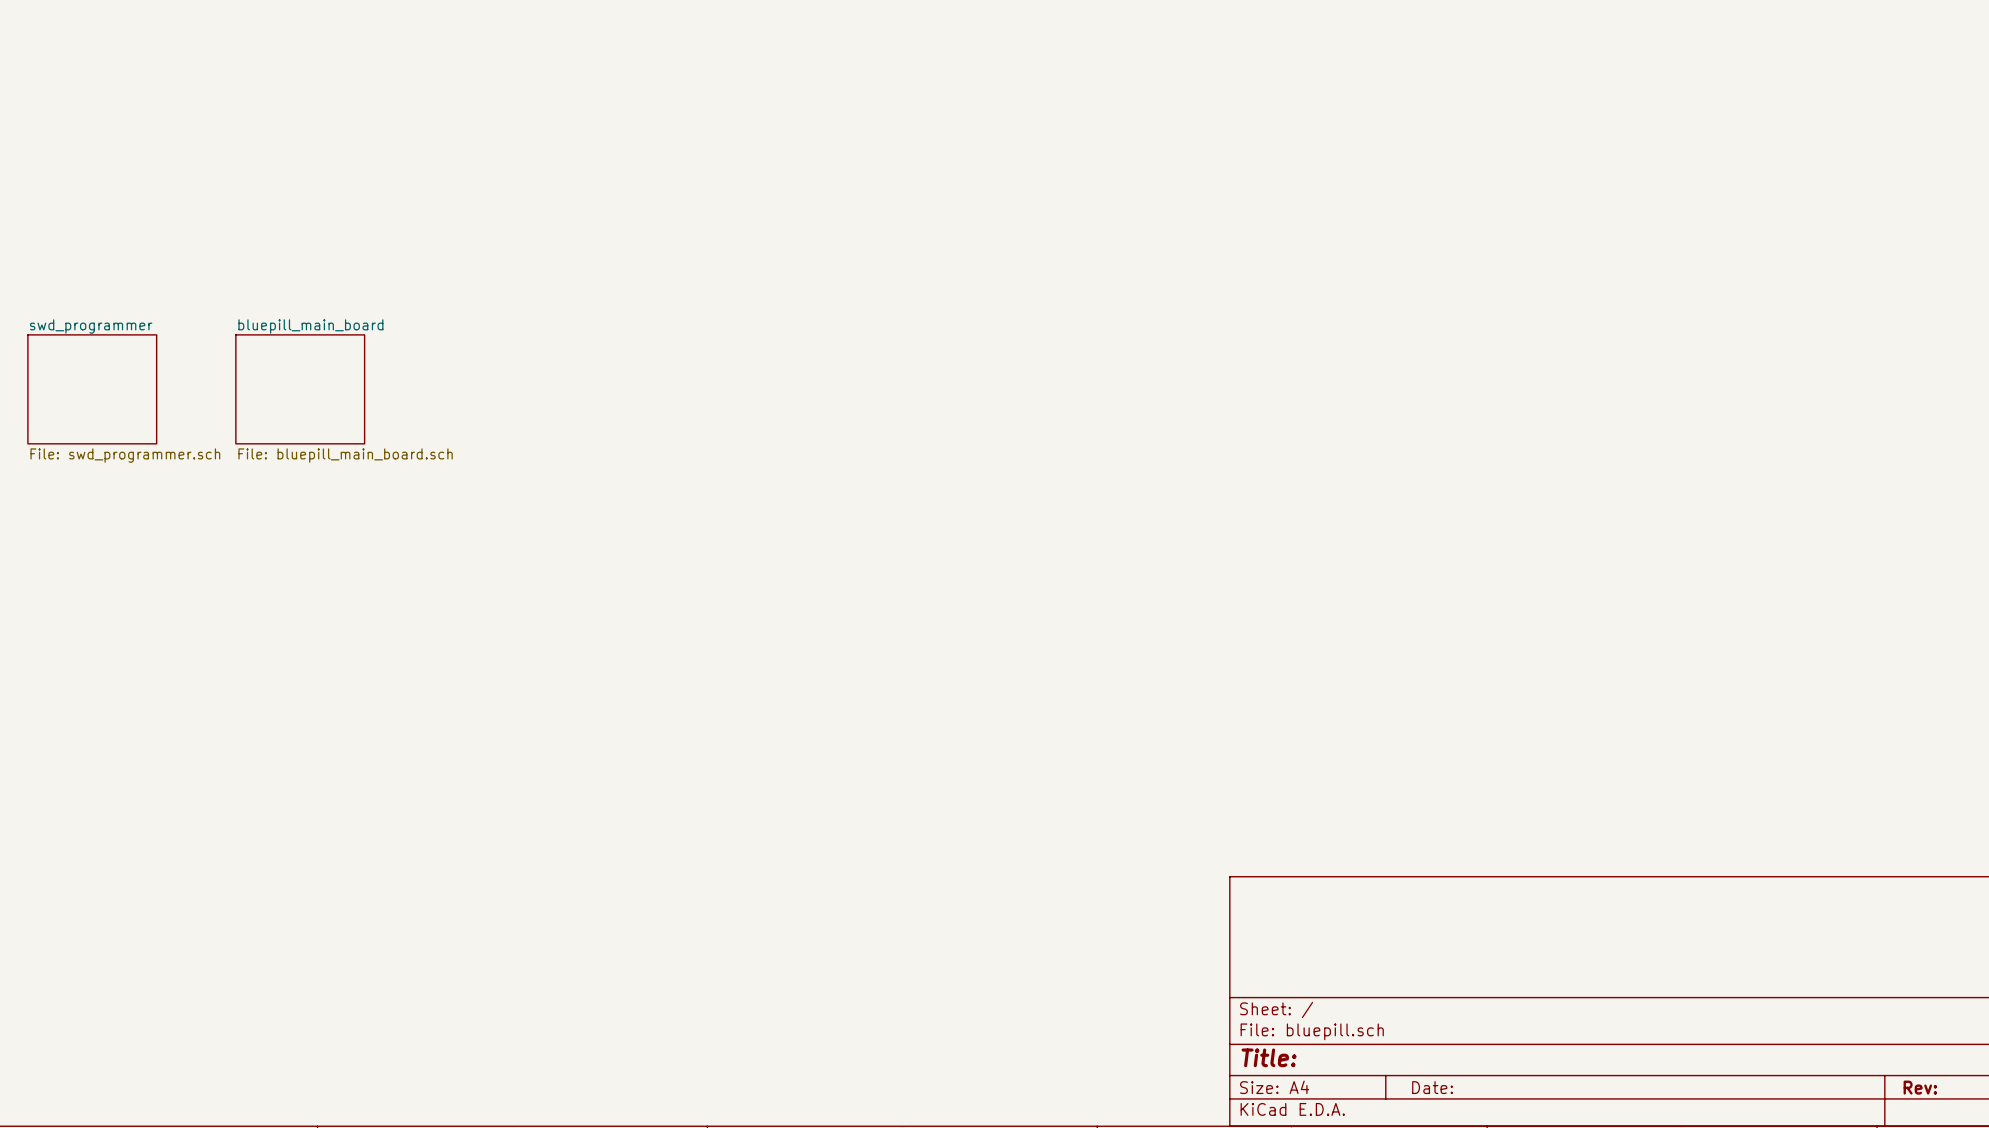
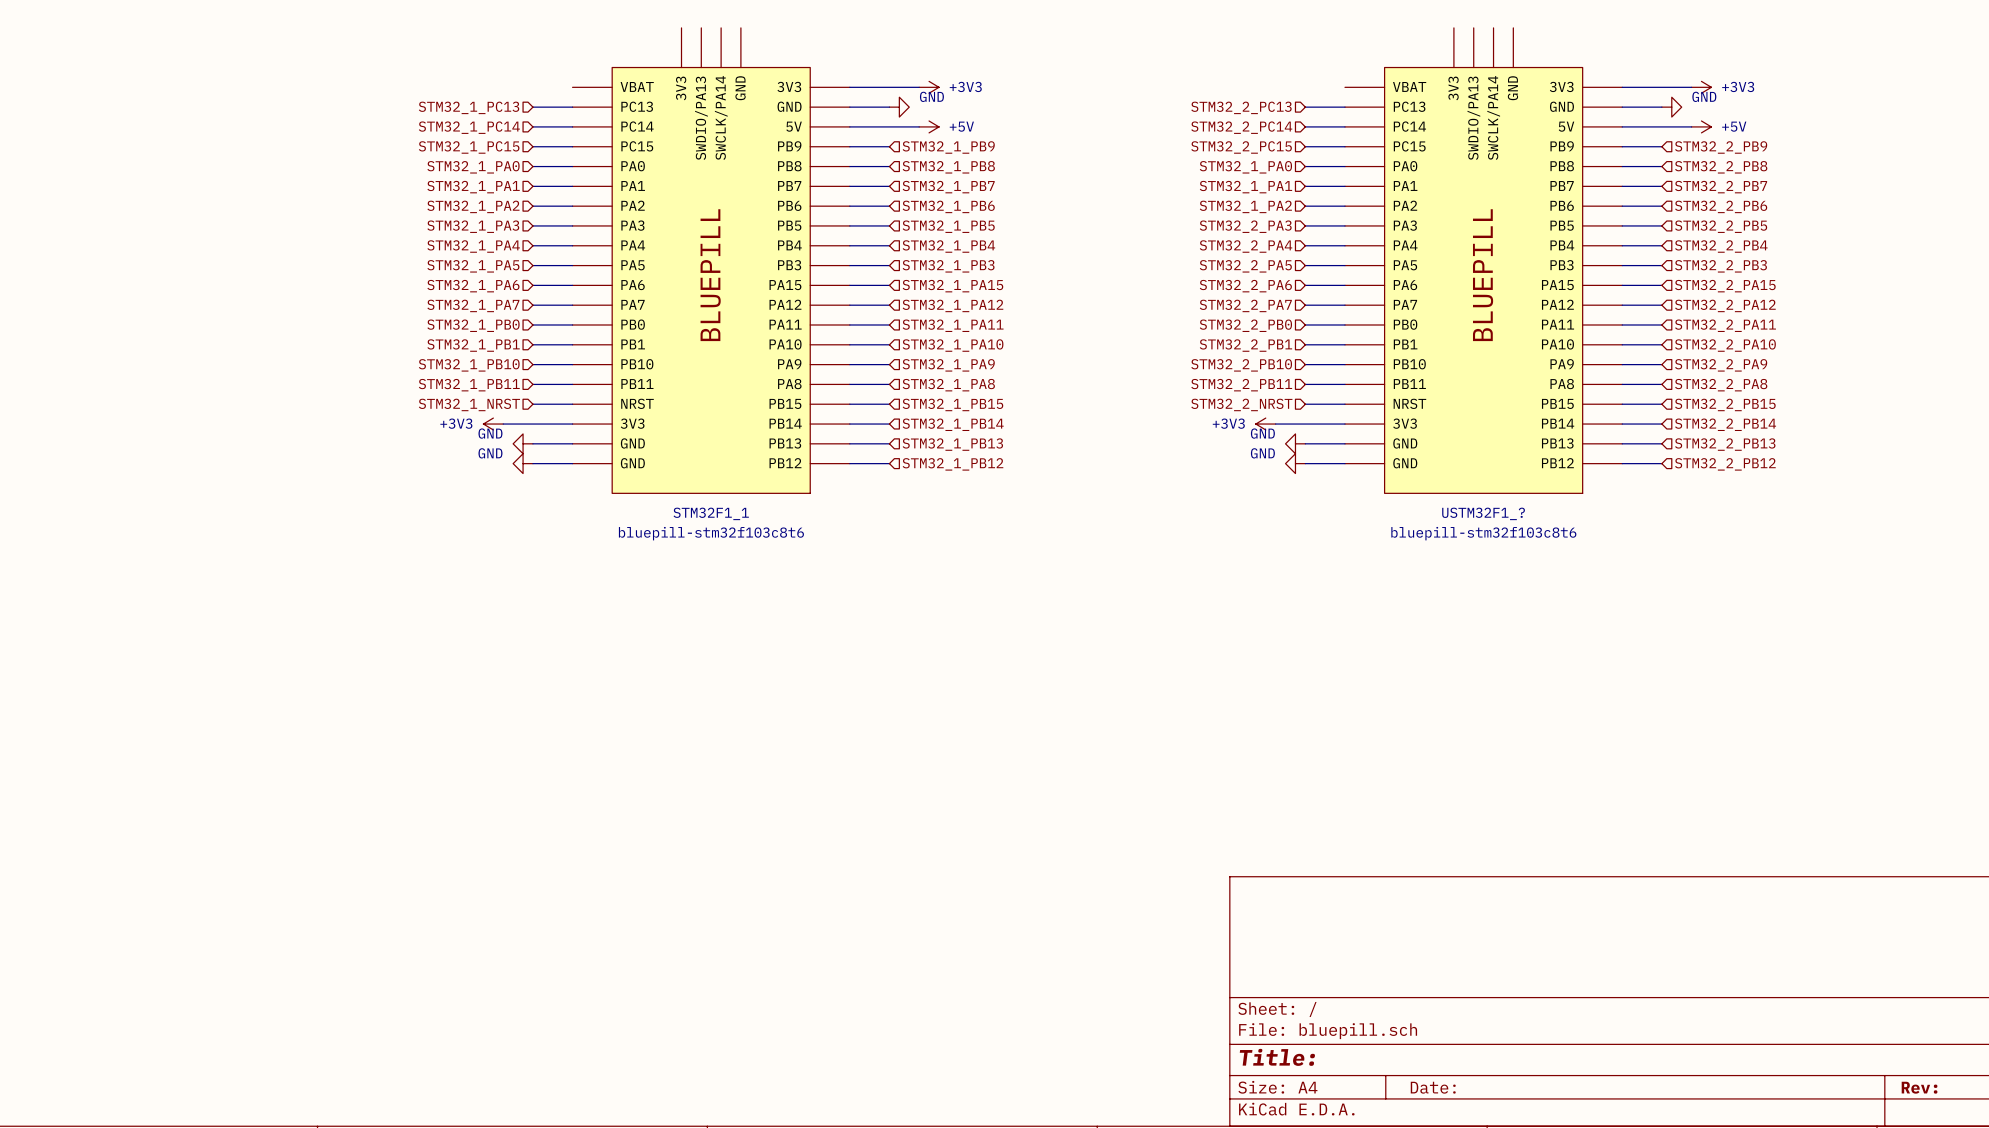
wire: none -> (849, 87) (919, 87)
power symbol: none -> +3V3 (929, 87)
wire: none -> (1622, 87) (1691, 87)
power symbol: none -> +3V3 (1701, 87)
hierarchical label: none -> STM32_1_PC13 (469, 107)
wire: none -> (532, 107) (572, 107)
wire: none -> (849, 107) (889, 107)
power symbol: none -> GND (899, 107)
hierarchical label: none -> STM32_2_PC13 (1241, 107)
wire: none -> (1305, 107) (1344, 107)
wire: none -> (1622, 107) (1661, 107)
power symbol: none -> GND (1671, 107)
hierarchical label: none -> STM32_1_PC14 (469, 127)
wire: none -> (532, 126) (572, 126)
wire: none -> (849, 126) (919, 126)
power symbol: none -> +5V (929, 126)
hierarchical label: none -> STM32_2_PC14 (1241, 127)
wire: none -> (1305, 126) (1344, 126)
wire: none -> (1622, 126) (1691, 126)
power symbol: none -> +5V (1701, 126)
hierarchical label: none -> STM32_1_PC15 (469, 147)
wire: none -> (532, 146) (572, 146)
wire: none -> (849, 146) (889, 146)
hierarchical label: none -> STM32_1_PB9 (948, 147)
hierarchical label: none -> STM32_2_PC15 (1241, 147)
wire: none -> (1305, 146) (1344, 146)
wire: none -> (1622, 146) (1661, 146)
hierarchical label: none -> STM32_2_PB9 (1721, 147)
hierarchical label: none -> STM32_1_PA0 (473, 167)
wire: none -> (532, 166) (572, 166)
wire: none -> (849, 166) (889, 166)
hierarchical label: none -> STM32_1_PB8 (948, 167)
hierarchical label: none -> STM32_1_PA0 (1245, 167)
wire: none -> (1305, 166) (1344, 166)
wire: none -> (1622, 166) (1661, 166)
hierarchical label: none -> STM32_2_PB8 (1721, 167)
hierarchical label: none -> STM32_1_PA1 (473, 187)
wire: none -> (532, 186) (572, 186)
wire: none -> (849, 186) (889, 186)
hierarchical label: none -> STM32_1_PB7 (948, 187)
hierarchical label: none -> STM32_1_PA1 (1245, 187)
wire: none -> (1305, 186) (1344, 186)
wire: none -> (1622, 186) (1661, 186)
hierarchical label: none -> STM32_2_PB7 (1721, 187)
hierarchical label: none -> STM32_1_PA2 (473, 206)
wire: none -> (532, 206) (572, 206)
wire: none -> (849, 206) (889, 206)
hierarchical label: none -> STM32_1_PB6 (948, 206)
hierarchical label: none -> STM32_1_PA2 (1245, 206)
wire: none -> (1305, 206) (1344, 206)
wire: none -> (1622, 206) (1661, 206)
hierarchical label: none -> STM32_2_PB6 (1721, 206)
wire: none -> (532, 225) (572, 225)
wire: none -> (849, 225) (889, 225)
wire: none -> (1305, 225) (1344, 225)
wire: none -> (1622, 225) (1661, 225)
hierarchical label: none -> STM32_1_PA3 (473, 226)
hierarchical label: none -> STM32_1_PB5 (948, 226)
hierarchical label: none -> STM32_2_PA3 (1245, 226)
hierarchical label: none -> STM32_2_PB5 (1721, 226)
hierarchical label: none -> STM32_1_PA4 (473, 246)
wire: none -> (532, 245) (572, 245)
wire: none -> (849, 245) (889, 245)
hierarchical label: none -> STM32_1_PB4 (948, 246)
hierarchical label: none -> STM32_2_PA4 (1246, 246)
wire: none -> (1305, 245) (1344, 245)
wire: none -> (1622, 245) (1661, 245)
hierarchical label: none -> STM32_2_PB4 (1721, 246)
STM32F1_1: none -> bluepill-stm32f103c8t6 (711, 260)
USTM32F1_?: none -> bluepill-stm32f103c8t6 (1483, 260)
hierarchical label: none -> STM32_1_PA5 (473, 266)
wire: none -> (532, 265) (572, 265)
wire: none -> (849, 265) (889, 265)
hierarchical label: none -> STM32_1_PB3 (948, 266)
hierarchical label: none -> STM32_2_PA5 (1245, 266)
wire: none -> (1305, 265) (1344, 265)
wire: none -> (1622, 265) (1661, 265)
hierarchical label: none -> STM32_2_PB3 (1721, 266)
hierarchical label: none -> STM32_1_PA6 (473, 286)
wire: none -> (532, 285) (572, 285)
wire: none -> (849, 285) (889, 285)
hierarchical label: none -> STM32_1_PA15 (952, 286)
hierarchical label: none -> STM32_2_PA6 (1245, 286)
wire: none -> (1305, 285) (1344, 285)
wire: none -> (1622, 285) (1661, 285)
hierarchical label: none -> STM32_2_PA15 (1725, 286)
hierarchical label: none -> STM32_1_PA7 (473, 305)
wire: none -> (532, 305) (572, 305)
wire: none -> (849, 305) (889, 305)
hierarchical label: none -> STM32_1_PA12 (952, 305)
hierarchical label: none -> STM32_2_PA7 (1245, 305)
wire: none -> (1305, 305) (1344, 305)
wire: none -> (1622, 305) (1661, 305)
hierarchical label: none -> STM32_2_PA12 (1725, 305)
wire: none -> (532, 324) (572, 324)
wire: none -> (849, 324) (889, 324)
wire: none -> (1305, 324) (1344, 324)
wire: none -> (1622, 324) (1661, 324)
hierarchical label: none -> STM32_1_PB0 (473, 325)
hierarchical label: none -> STM32_1_PA11 (953, 325)
hierarchical label: none -> STM32_2_PB0 (1245, 325)
hierarchical label: none -> STM32_2_PA11 (1725, 325)
hierarchical label: none -> STM32_1_PB1 (473, 345)
wire: none -> (532, 344) (572, 344)
wire: none -> (849, 344) (889, 344)
hierarchical label: none -> STM32_1_PA10 (953, 345)
hierarchical label: none -> STM32_2_PB1 (1245, 345)
wire: none -> (1305, 344) (1344, 344)
wire: none -> (1622, 344) (1661, 344)
hierarchical label: none -> STM32_2_PA10 (1725, 345)
hierarchical label: none -> STM32_1_PB10 (469, 365)
wire: none -> (532, 364) (572, 364)
wire: none -> (849, 364) (889, 364)
hierarchical label: none -> STM32_1_PA9 (948, 365)
hierarchical label: none -> STM32_2_PB10 (1241, 365)
wire: none -> (1305, 364) (1344, 364)
wire: none -> (1622, 364) (1661, 364)
hierarchical label: none -> STM32_2_PA9 (1721, 365)
hierarchical label: none -> STM32_1_PB11 (469, 385)
wire: none -> (532, 384) (572, 384)
wire: none -> (849, 384) (889, 384)
hierarchical label: none -> STM32_1_PA8 (948, 385)
hierarchical label: none -> STM32_2_PB11 (1241, 385)
wire: none -> (1305, 384) (1344, 384)
wire: none -> (1622, 384) (1661, 384)
hierarchical label: none -> STM32_2_PA8 (1721, 385)
sheet swd_programmer: File: swd_programmer.sch (92, 389) -> none
sheet bluepill_main_board: File: bluepill_main_board.sch (300, 389) -> none
hierarchical label: none -> STM32_1_NRST (469, 404)
wire: none -> (532, 404) (572, 404)
wire: none -> (849, 404) (889, 404)
hierarchical label: none -> STM32_1_PB15 (952, 404)
hierarchical label: none -> STM32_2_NRST (1241, 404)
wire: none -> (1305, 404) (1344, 404)
wire: none -> (1622, 404) (1661, 404)
hierarchical label: none -> STM32_2_PB15 (1725, 404)
hierarchical label: none -> STM32_1_PB14 (953, 424)
hierarchical label: none -> STM32_2_PB14 (1725, 424)
power symbol: none -> +3V3 (493, 424)
wire: none -> (503, 424) (572, 424)
wire: none -> (849, 424) (889, 424)
power symbol: none -> +3V3 (1265, 424)
wire: none -> (1275, 424) (1344, 424)
wire: none -> (1622, 424) (1661, 424)
power symbol: none -> GND (523, 443)
wire: none -> (532, 443) (572, 443)
wire: none -> (849, 443) (889, 443)
hierarchical label: none -> STM32_1_PB13 (952, 444)
power symbol: none -> GND (1295, 443)
wire: none -> (1305, 443) (1344, 443)
wire: none -> (1622, 443) (1661, 443)
hierarchical label: none -> STM32_2_PB13 (1725, 444)
power symbol: none -> GND (523, 463)
wire: none -> (532, 463) (572, 463)
wire: none -> (849, 463) (889, 463)
hierarchical label: none -> STM32_1_PB12 (952, 464)
power symbol: none -> GND (1295, 463)
wire: none -> (1305, 463) (1344, 463)
wire: none -> (1622, 463) (1661, 463)
hierarchical label: none -> STM32_2_PB12 (1725, 464)

